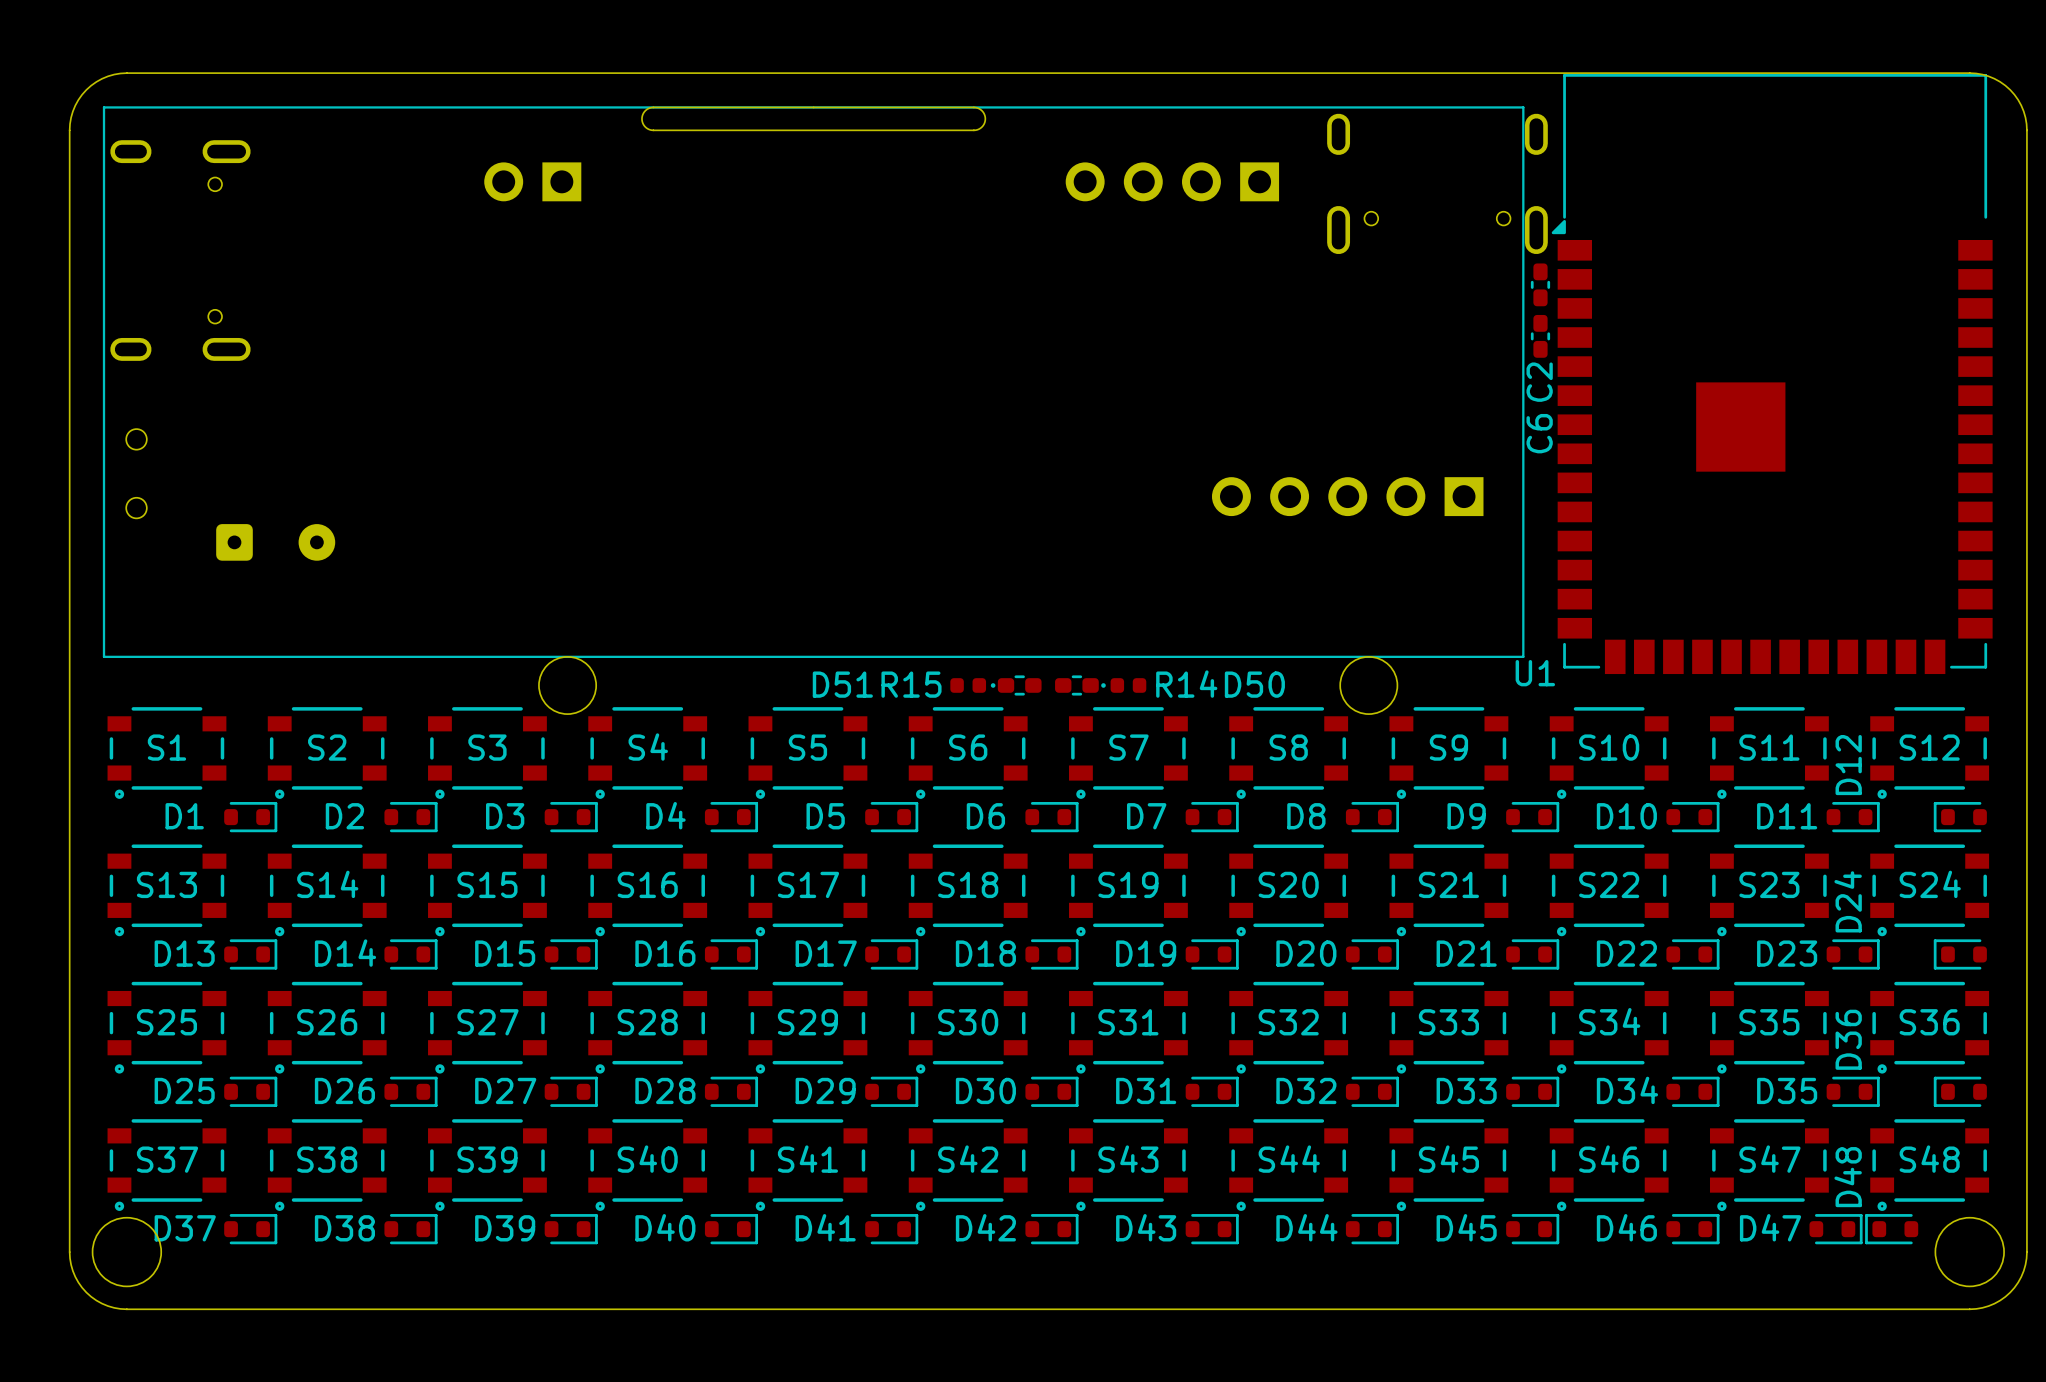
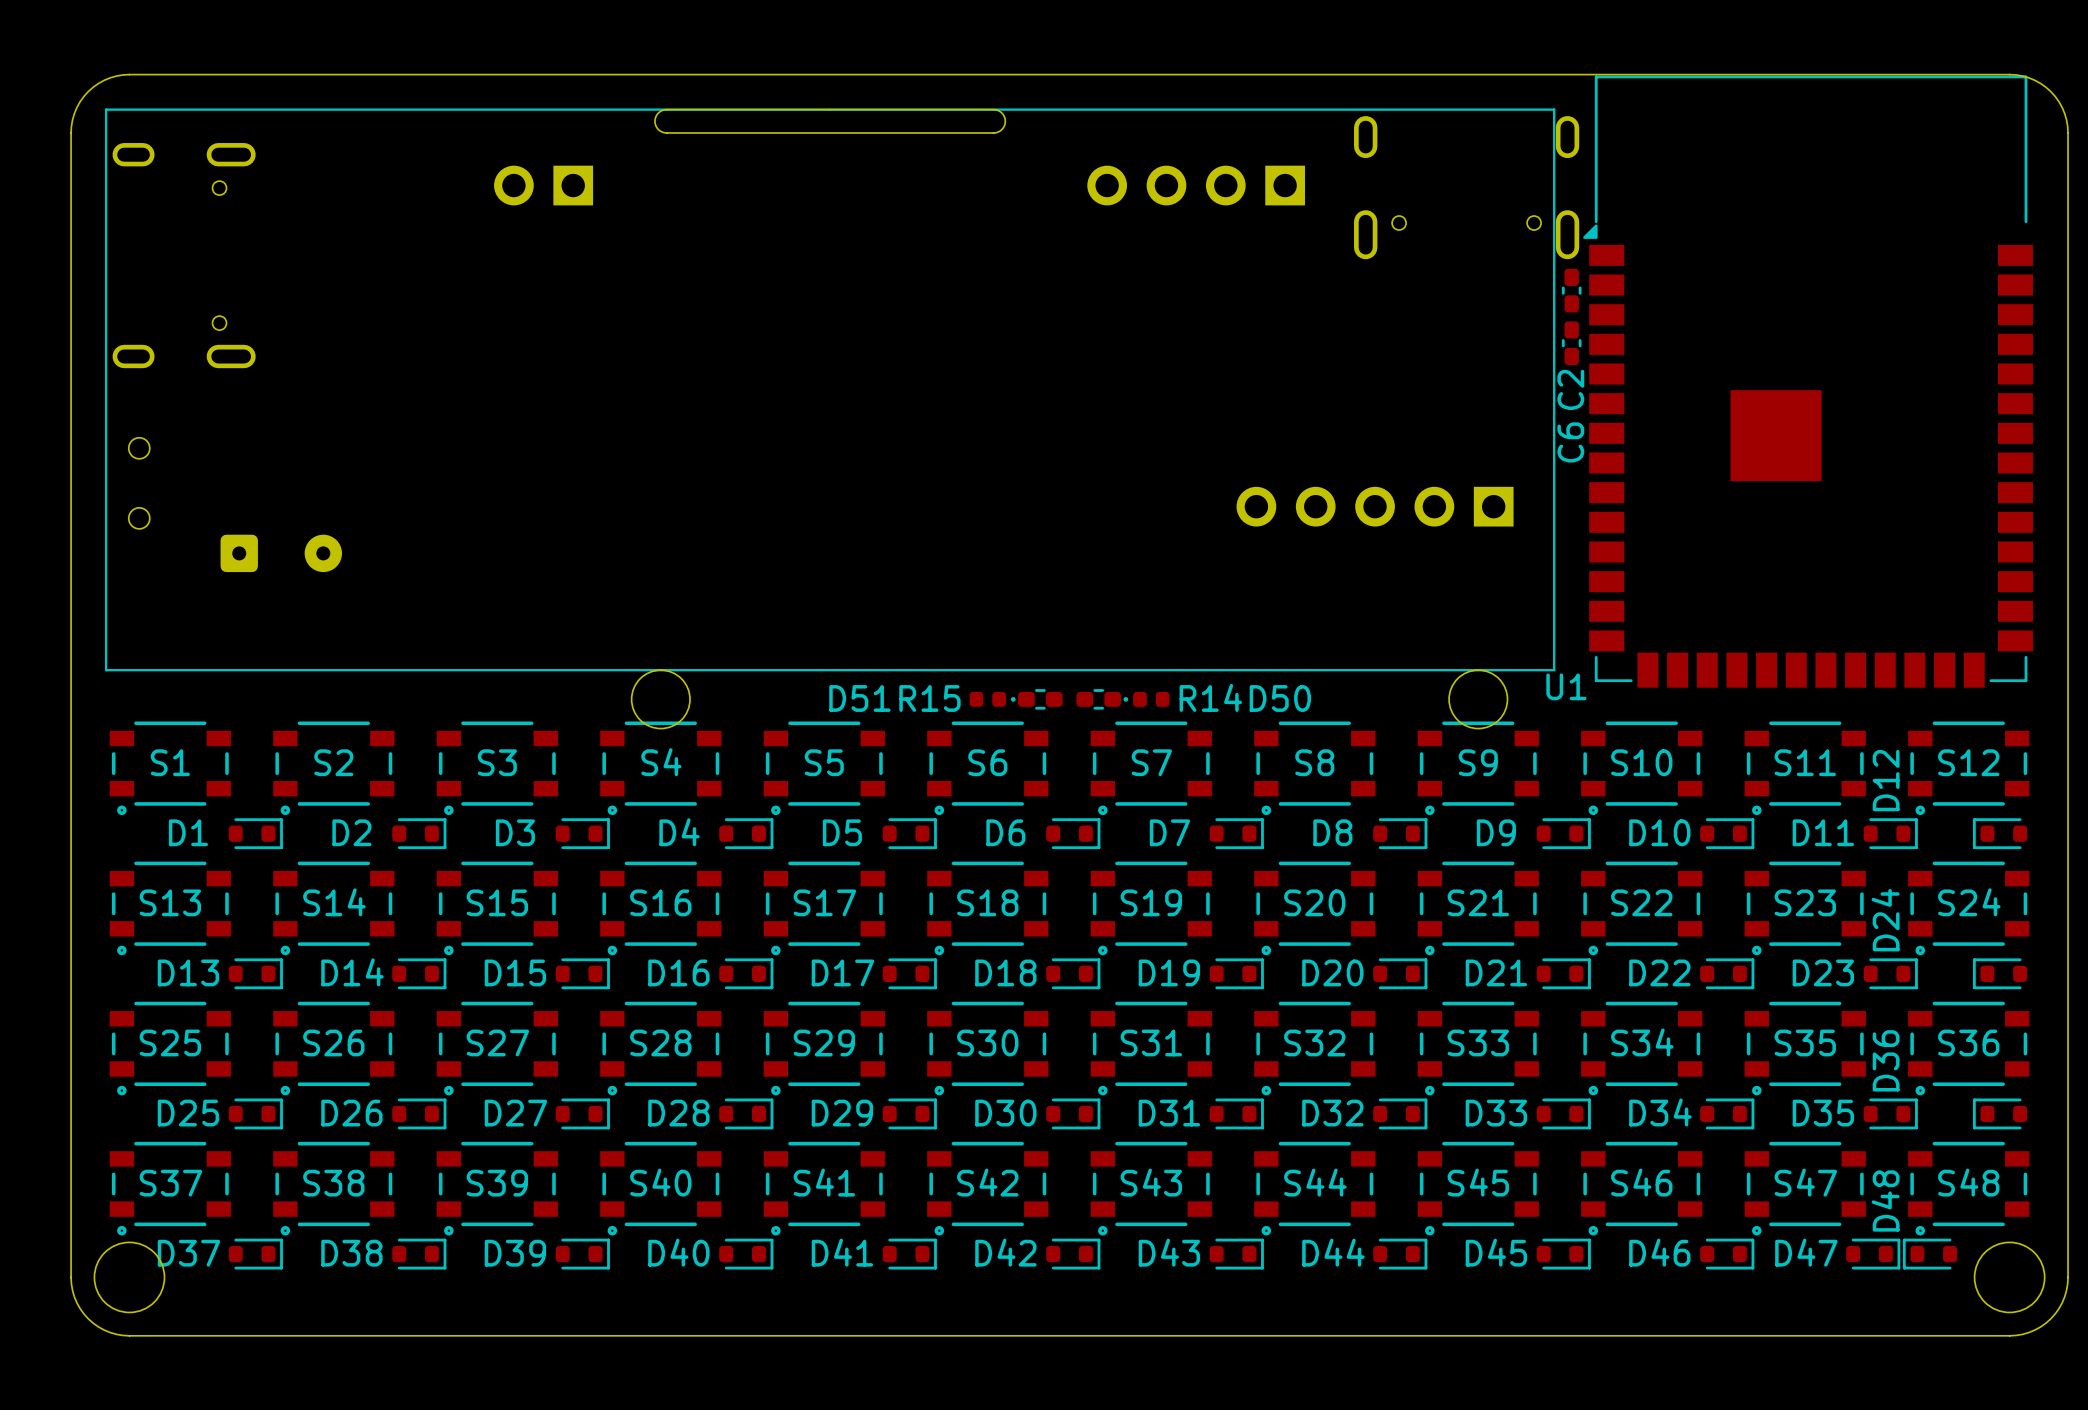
round board edge position: (567, 685) -> (660, 699)
round board edge position: (1368, 685) -> (1478, 699)

